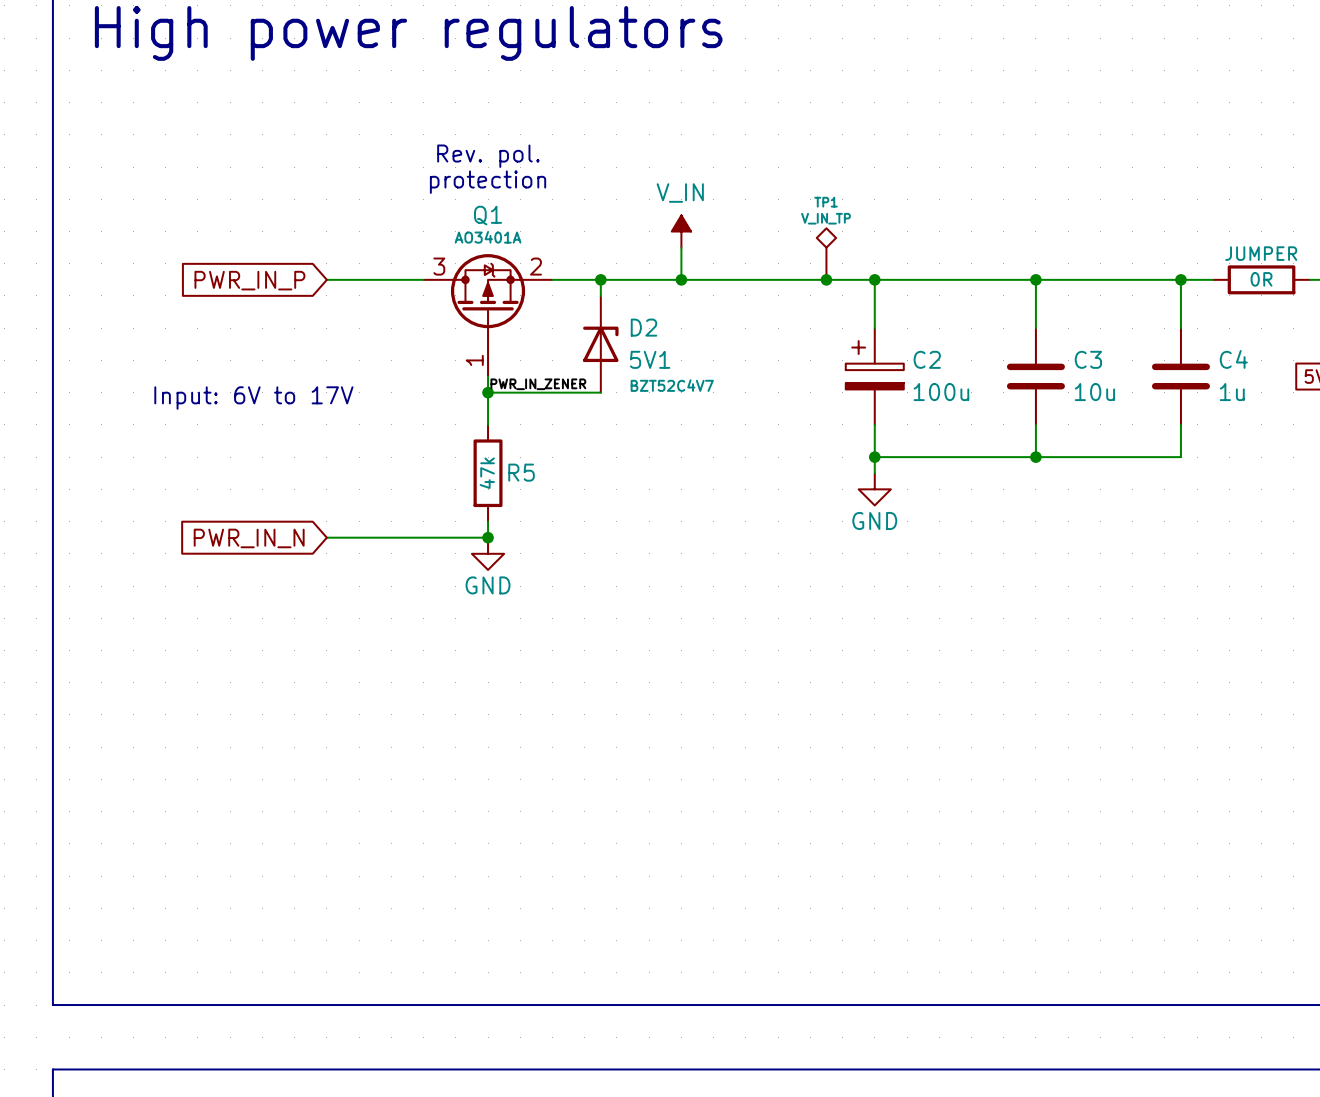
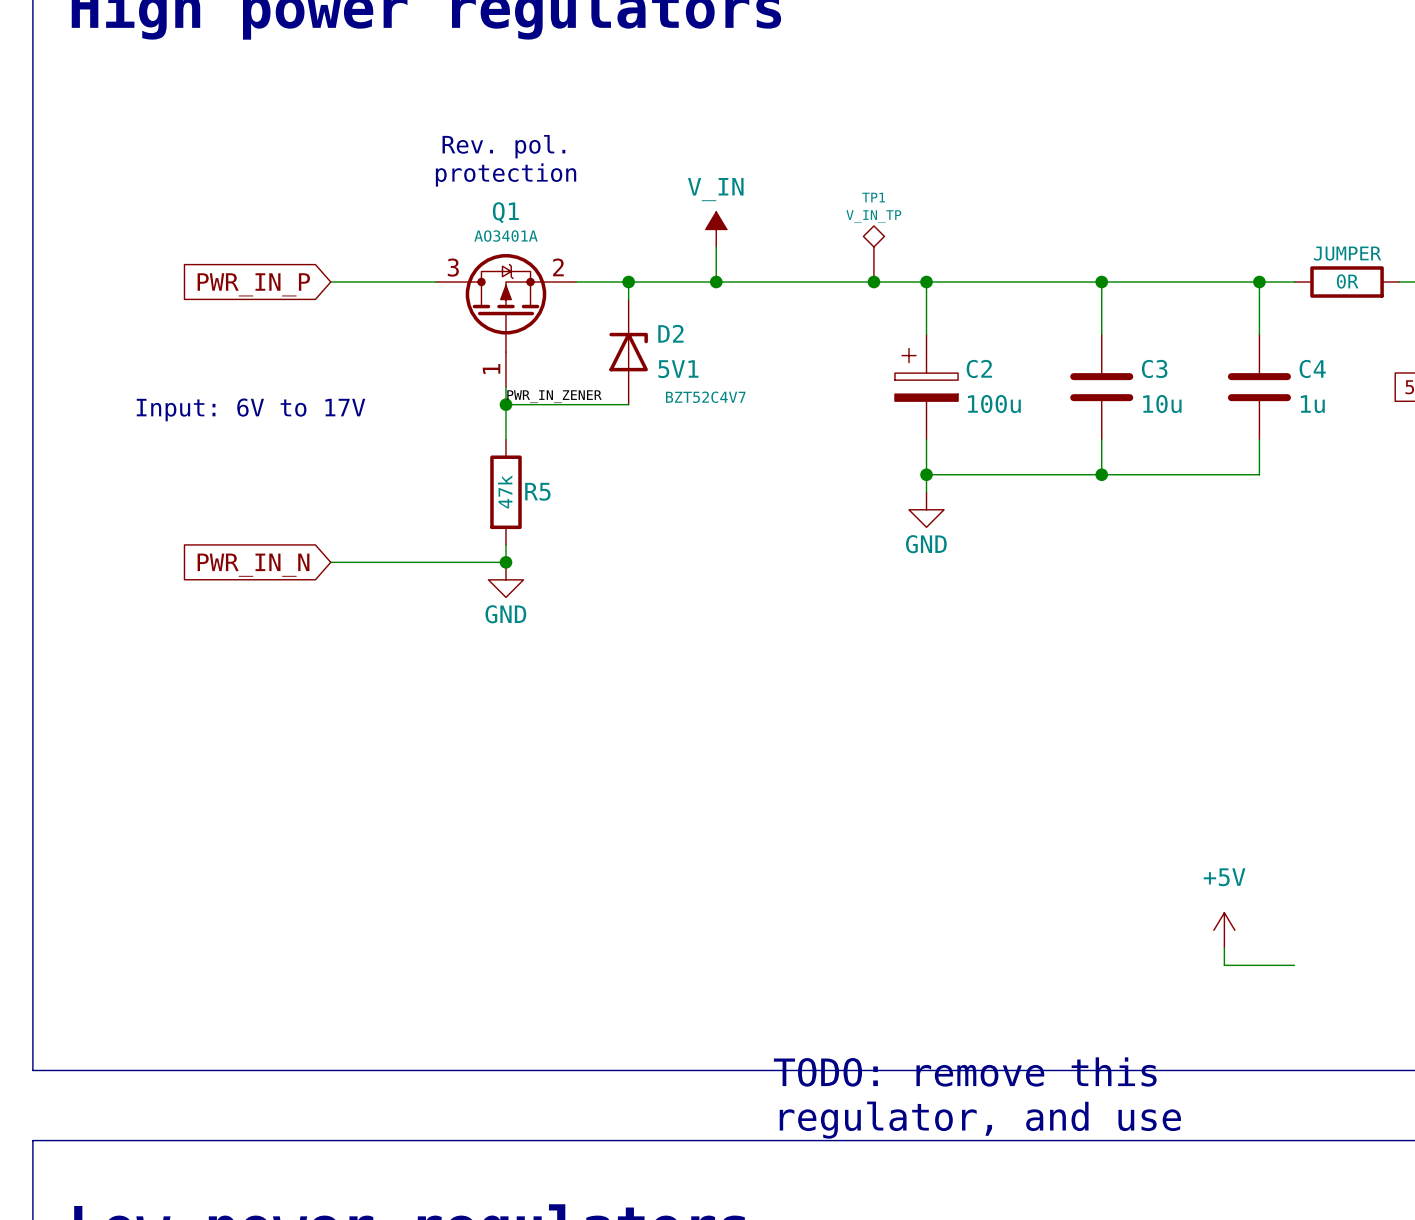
power symbol: none -> +5V (1224, 930)
wire: none -> (1224, 947) (1224, 965) (1294, 965)
text: none -> TODO: remove this (965, 1071)
text: none -> regulator, and use (980, 1120)

